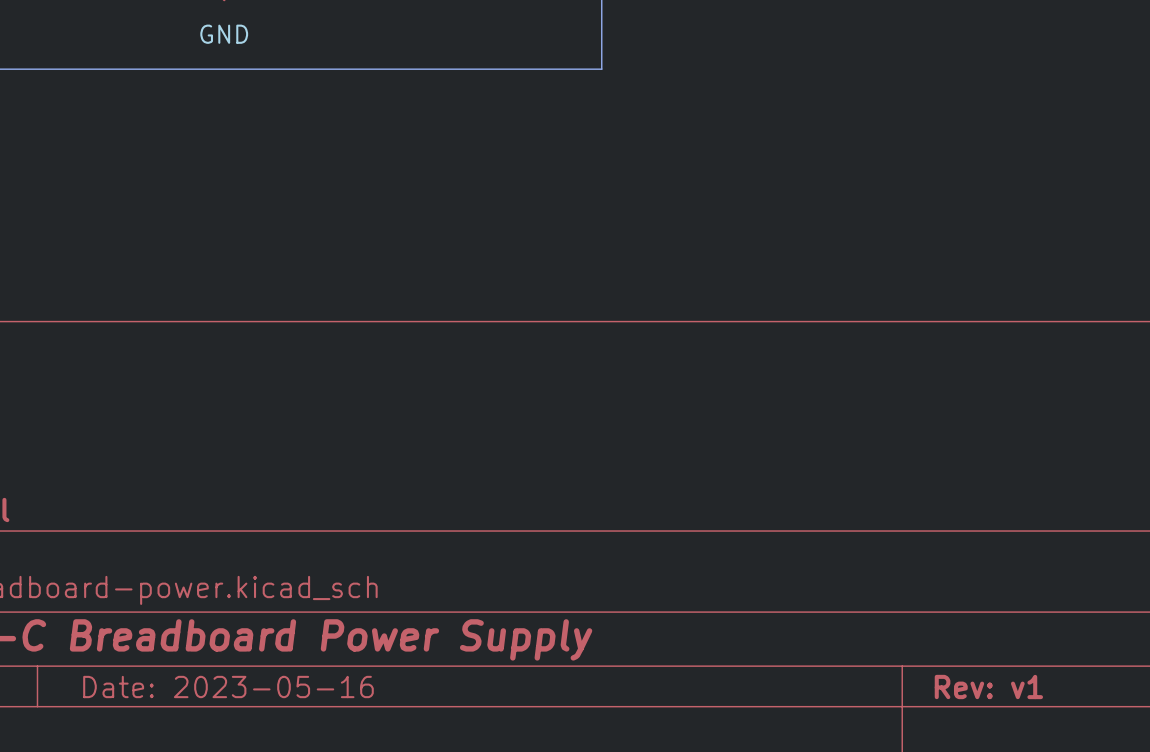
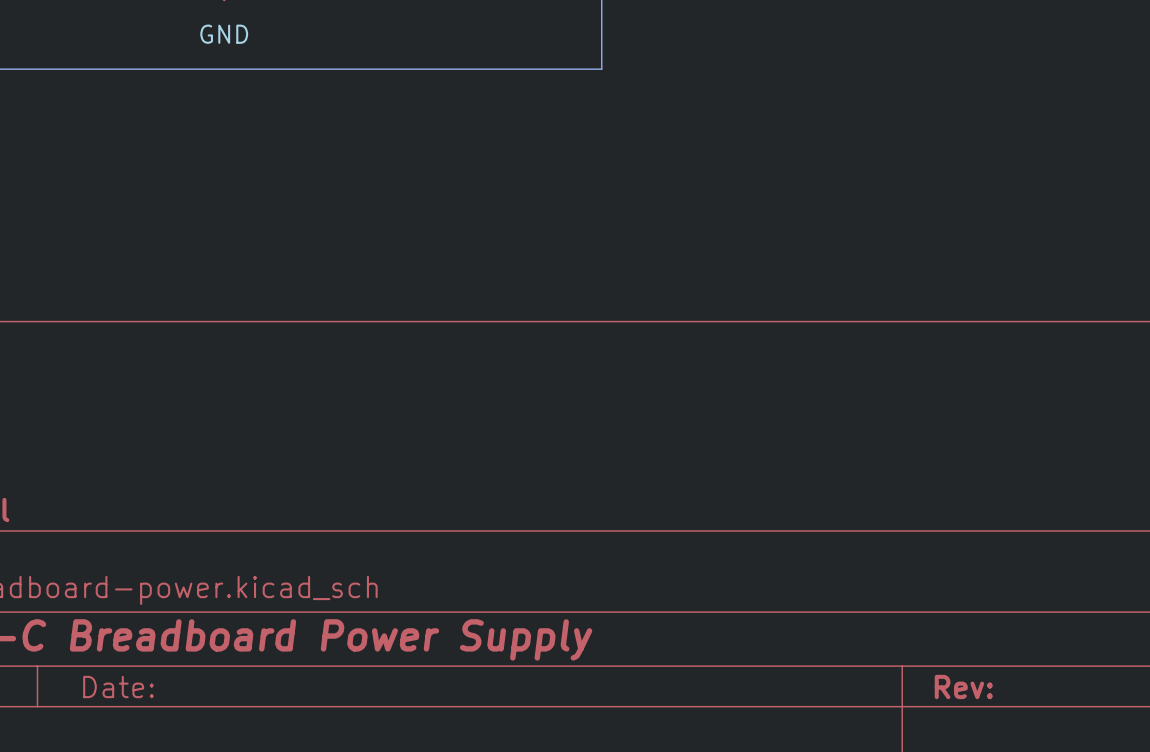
title block: Date: 2023-05-16 (228, 687) -> Date: (118, 687)
title block: Rev: v1 (988, 687) -> Rev: (963, 687)

